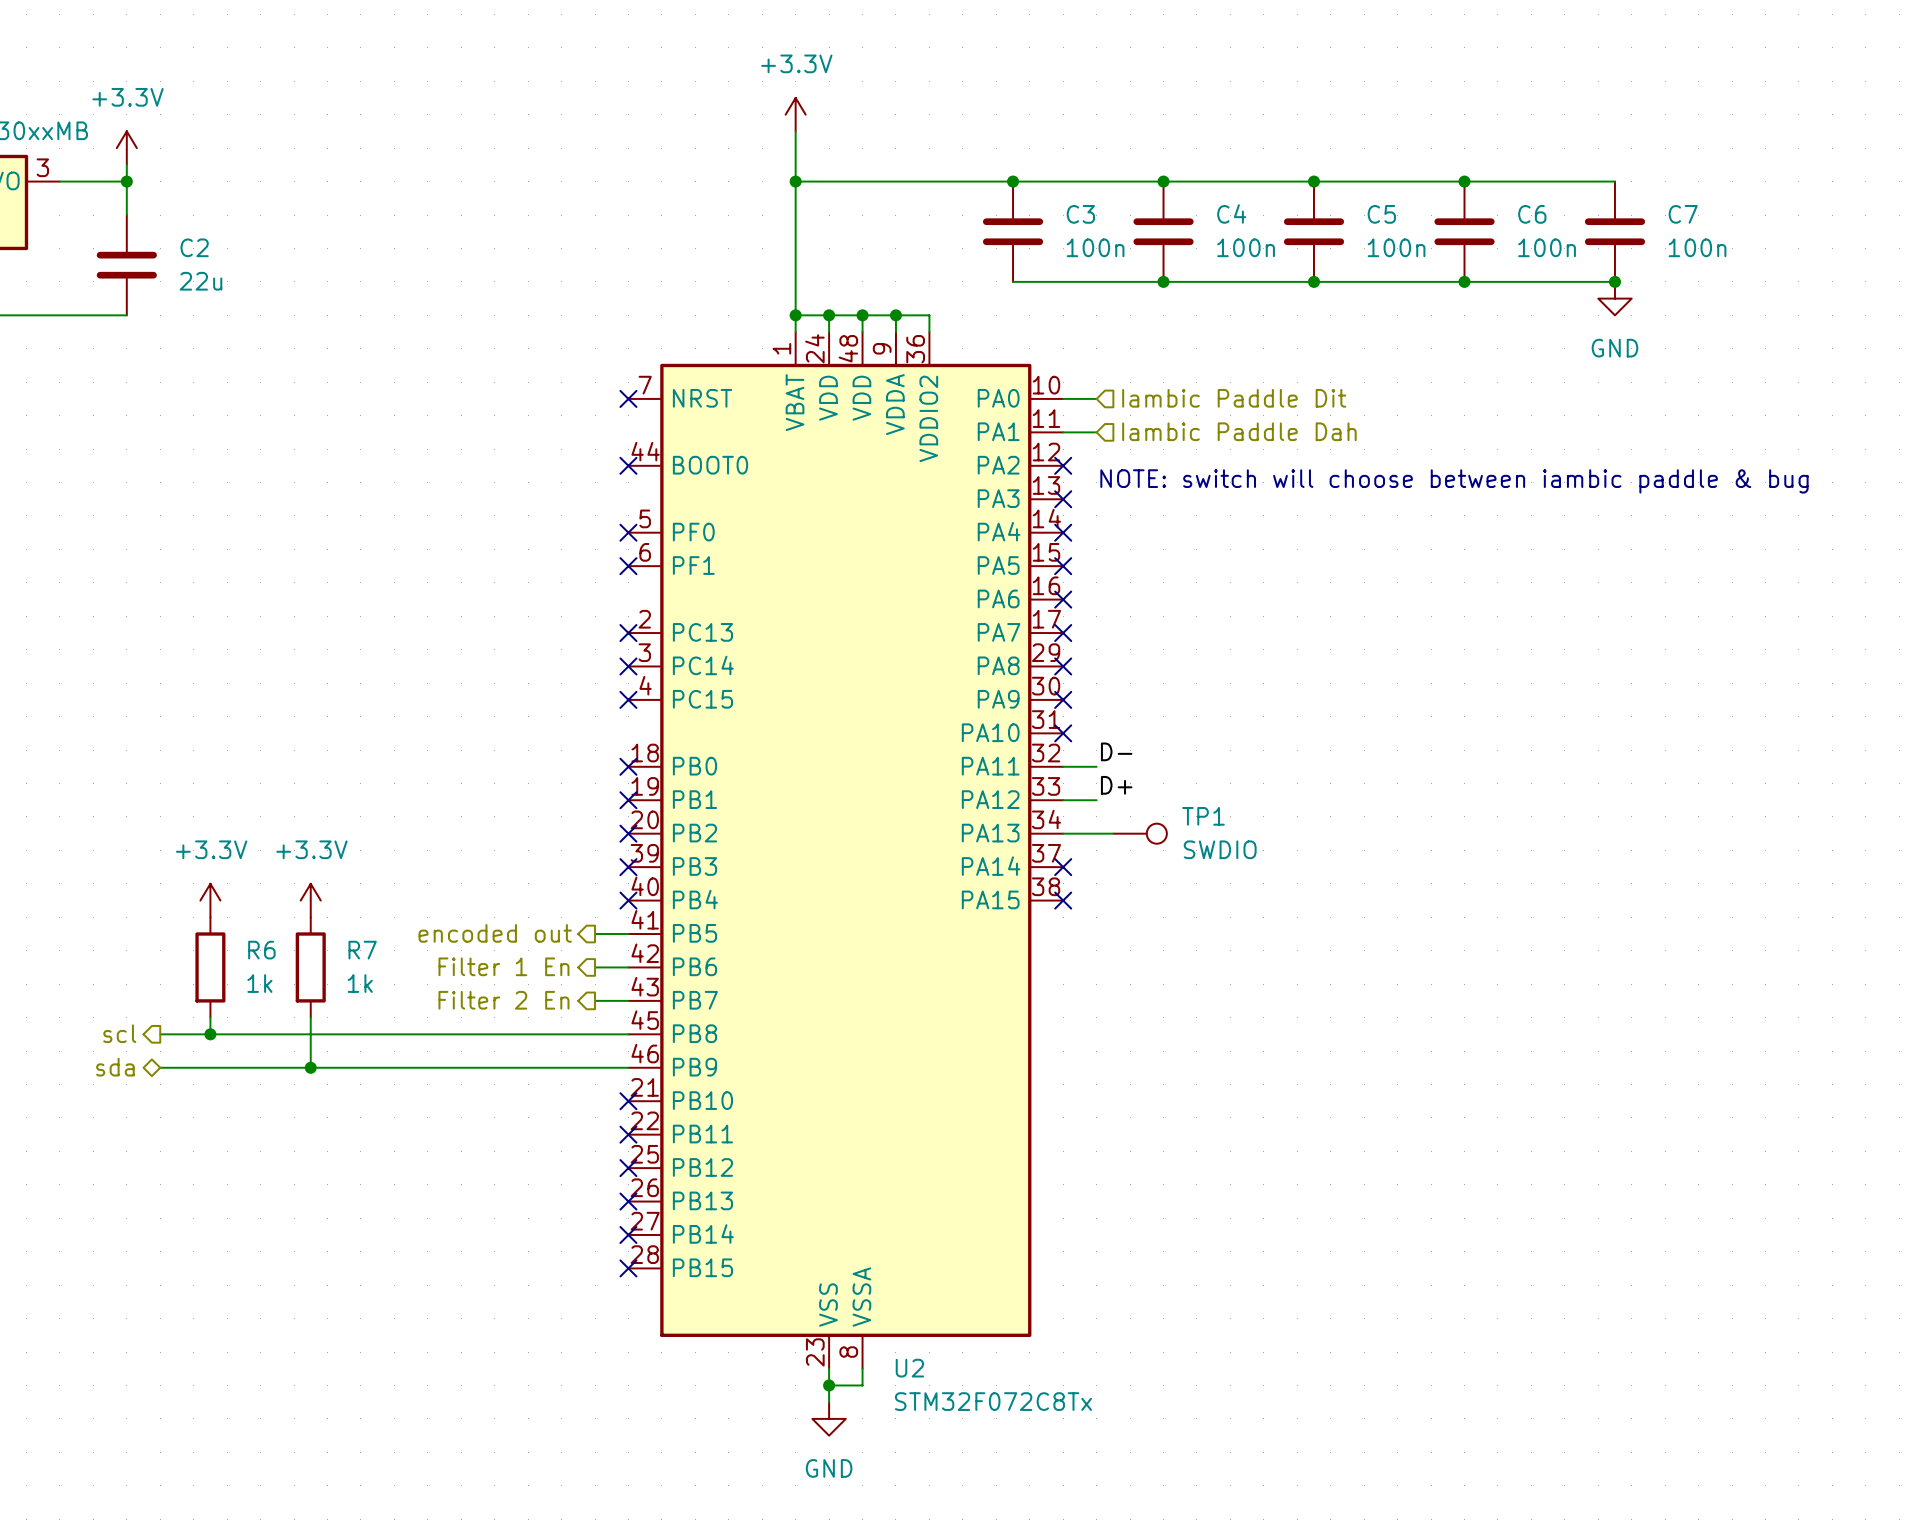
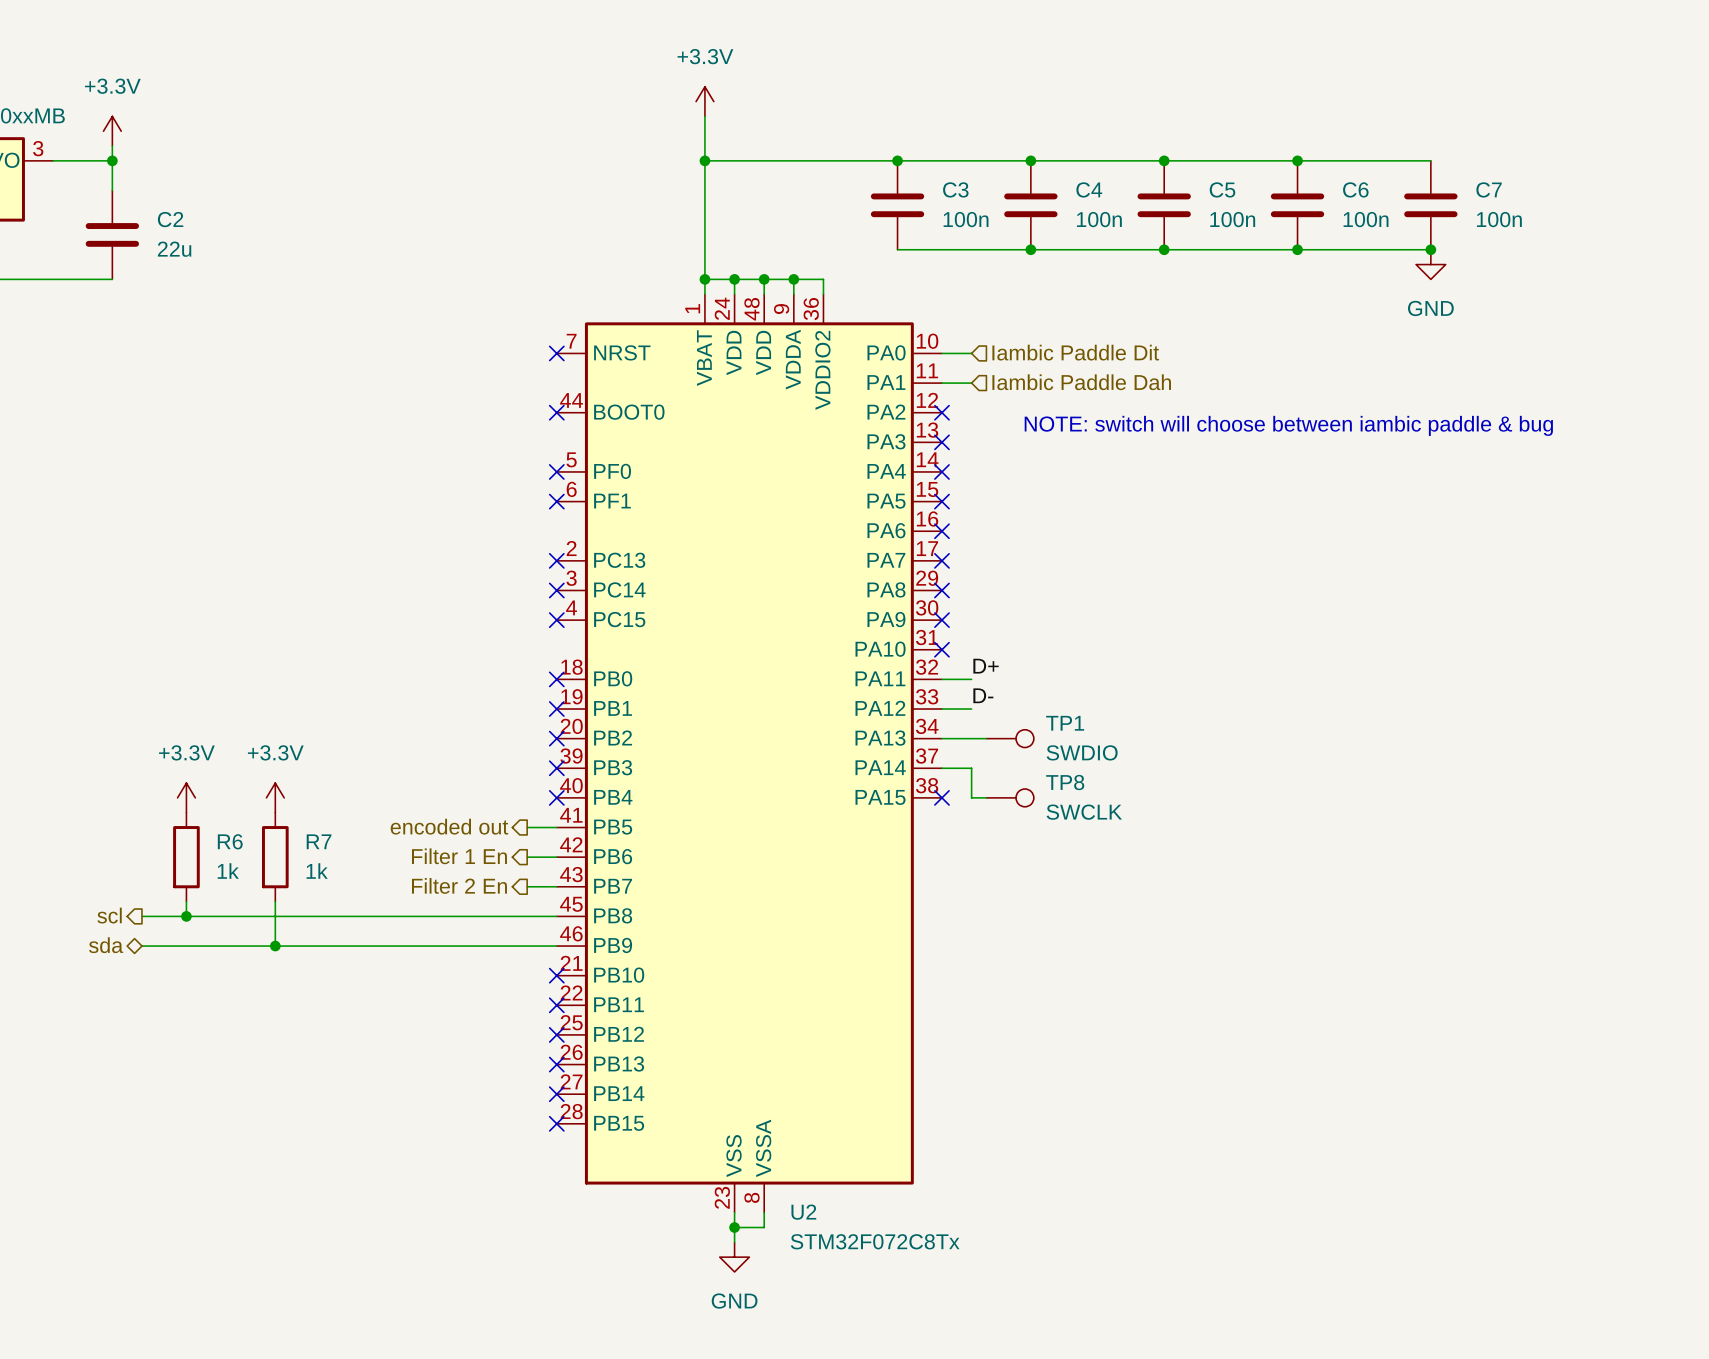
label: D- (1116, 751) -> D+ (986, 666)
label: D+ (1116, 785) -> D- (983, 695)
wire: none -> (941, 768) (971, 768) (971, 797) (986, 797)
no-connect mark: (1063, 867) -> none
TP8: none -> SWCLK (1010, 797)

